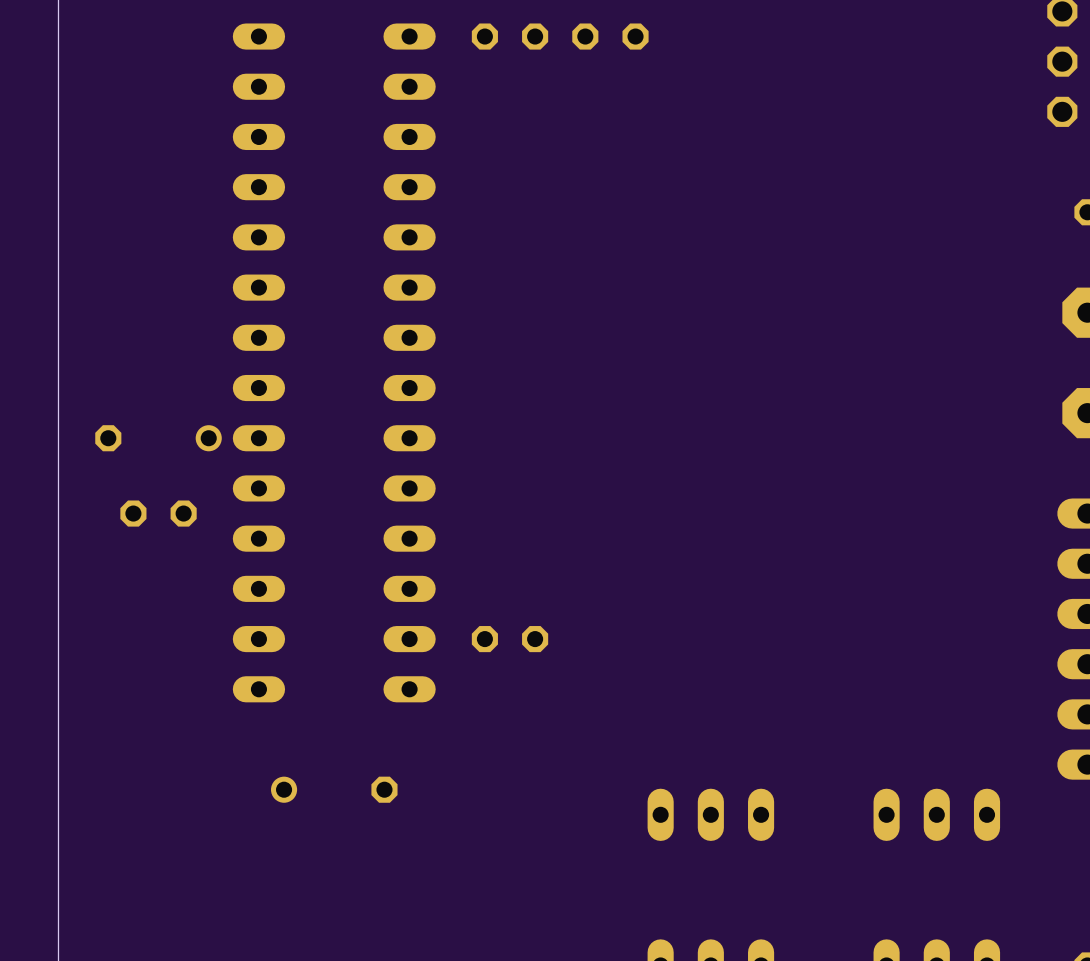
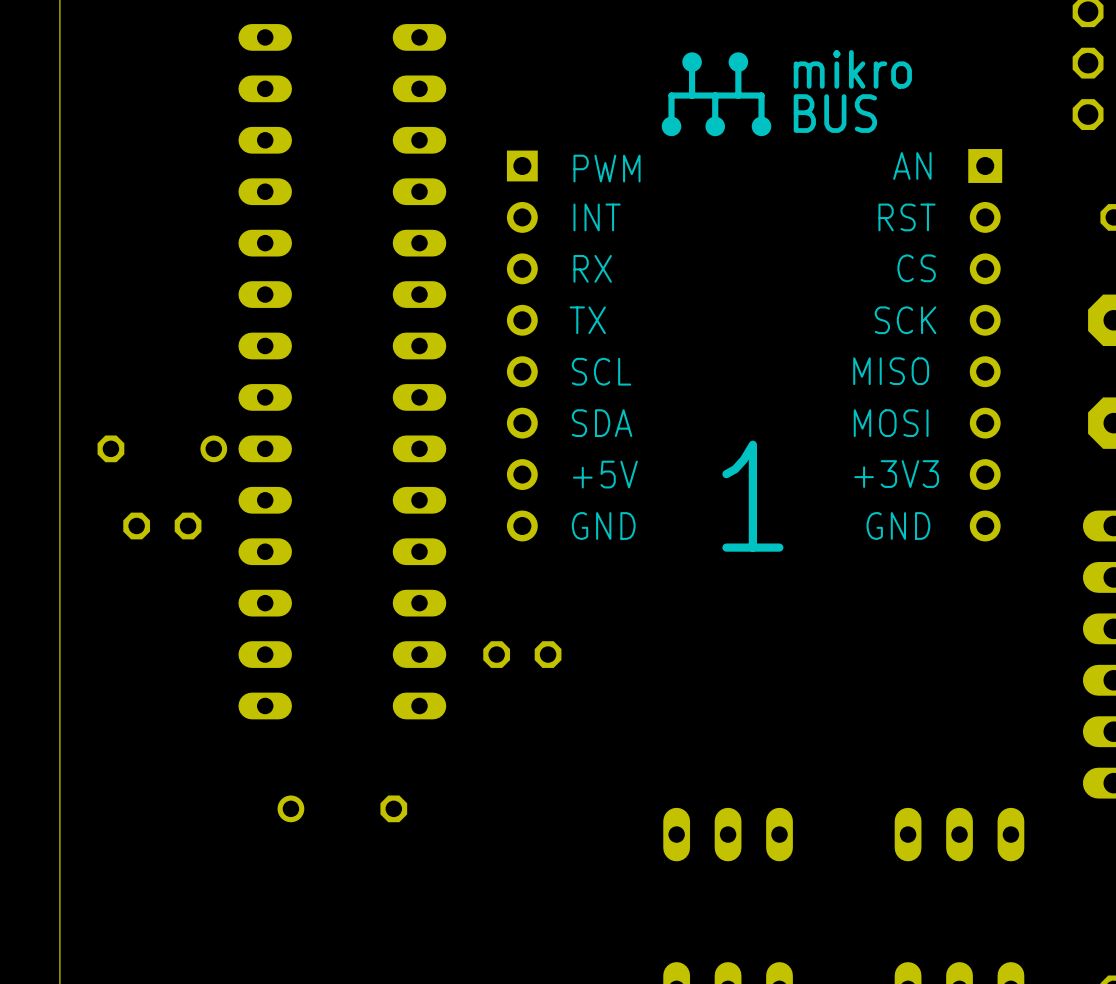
part: (510, 36) -> none
part: (610, 36) -> none
part: none -> (754, 296)

